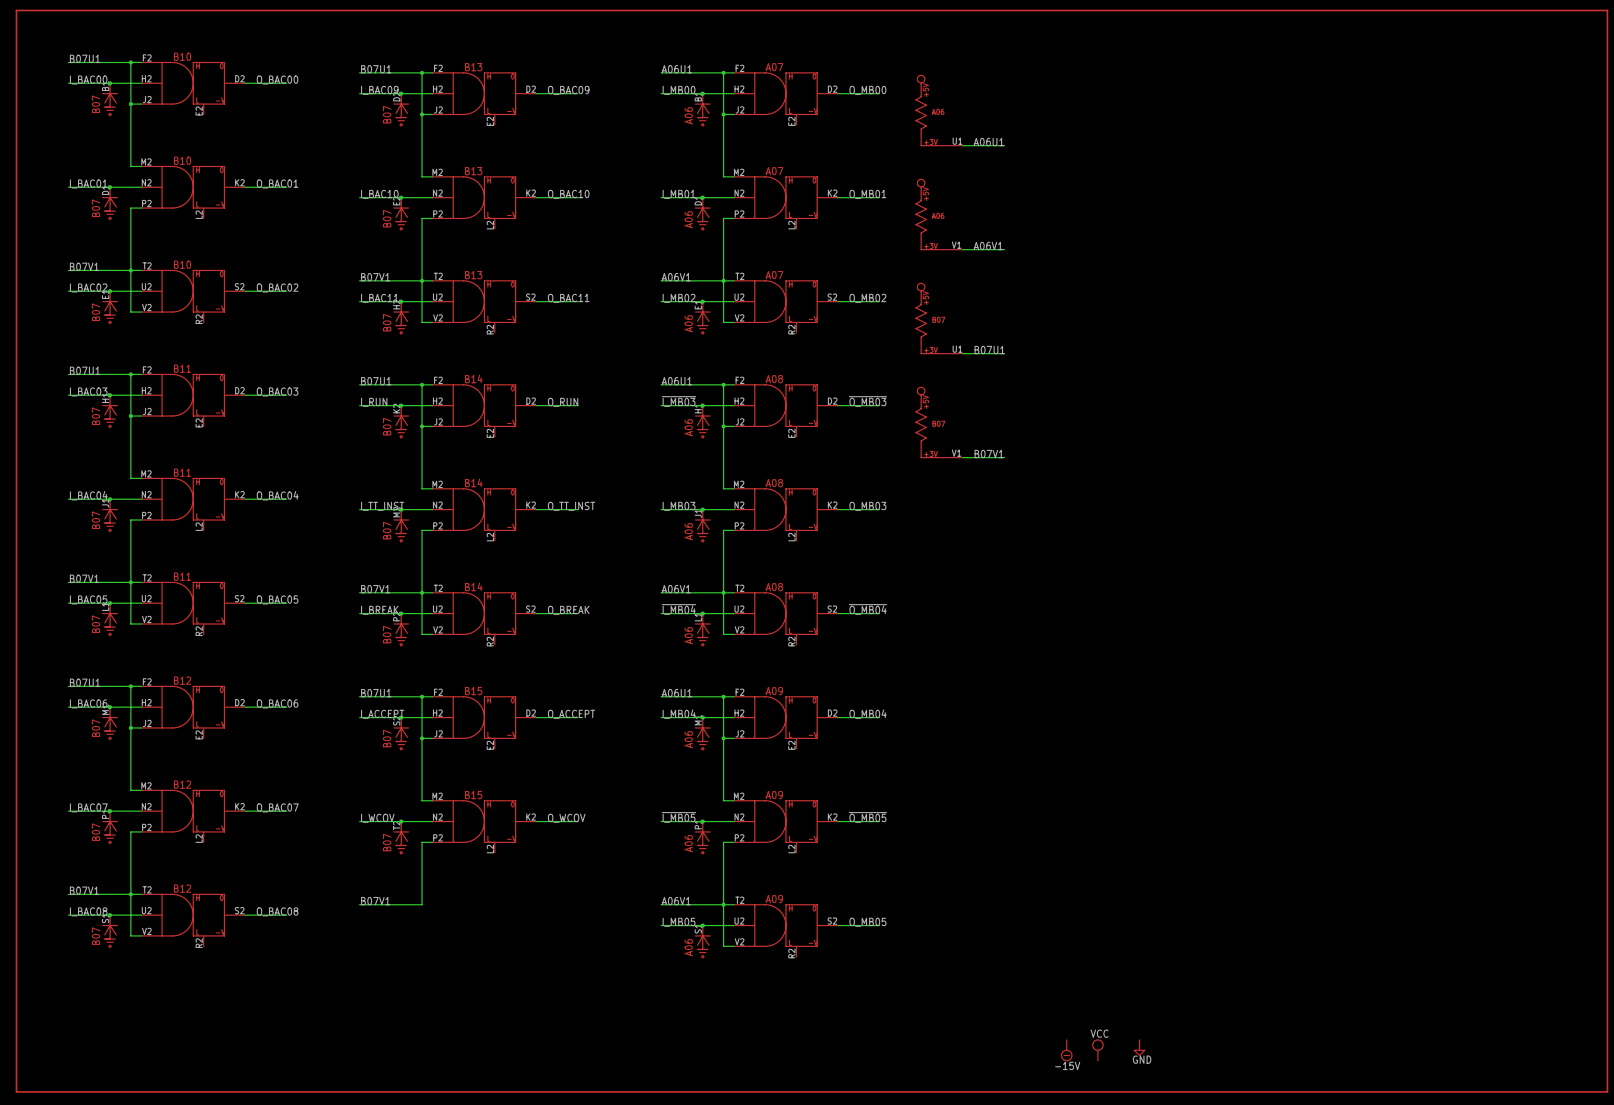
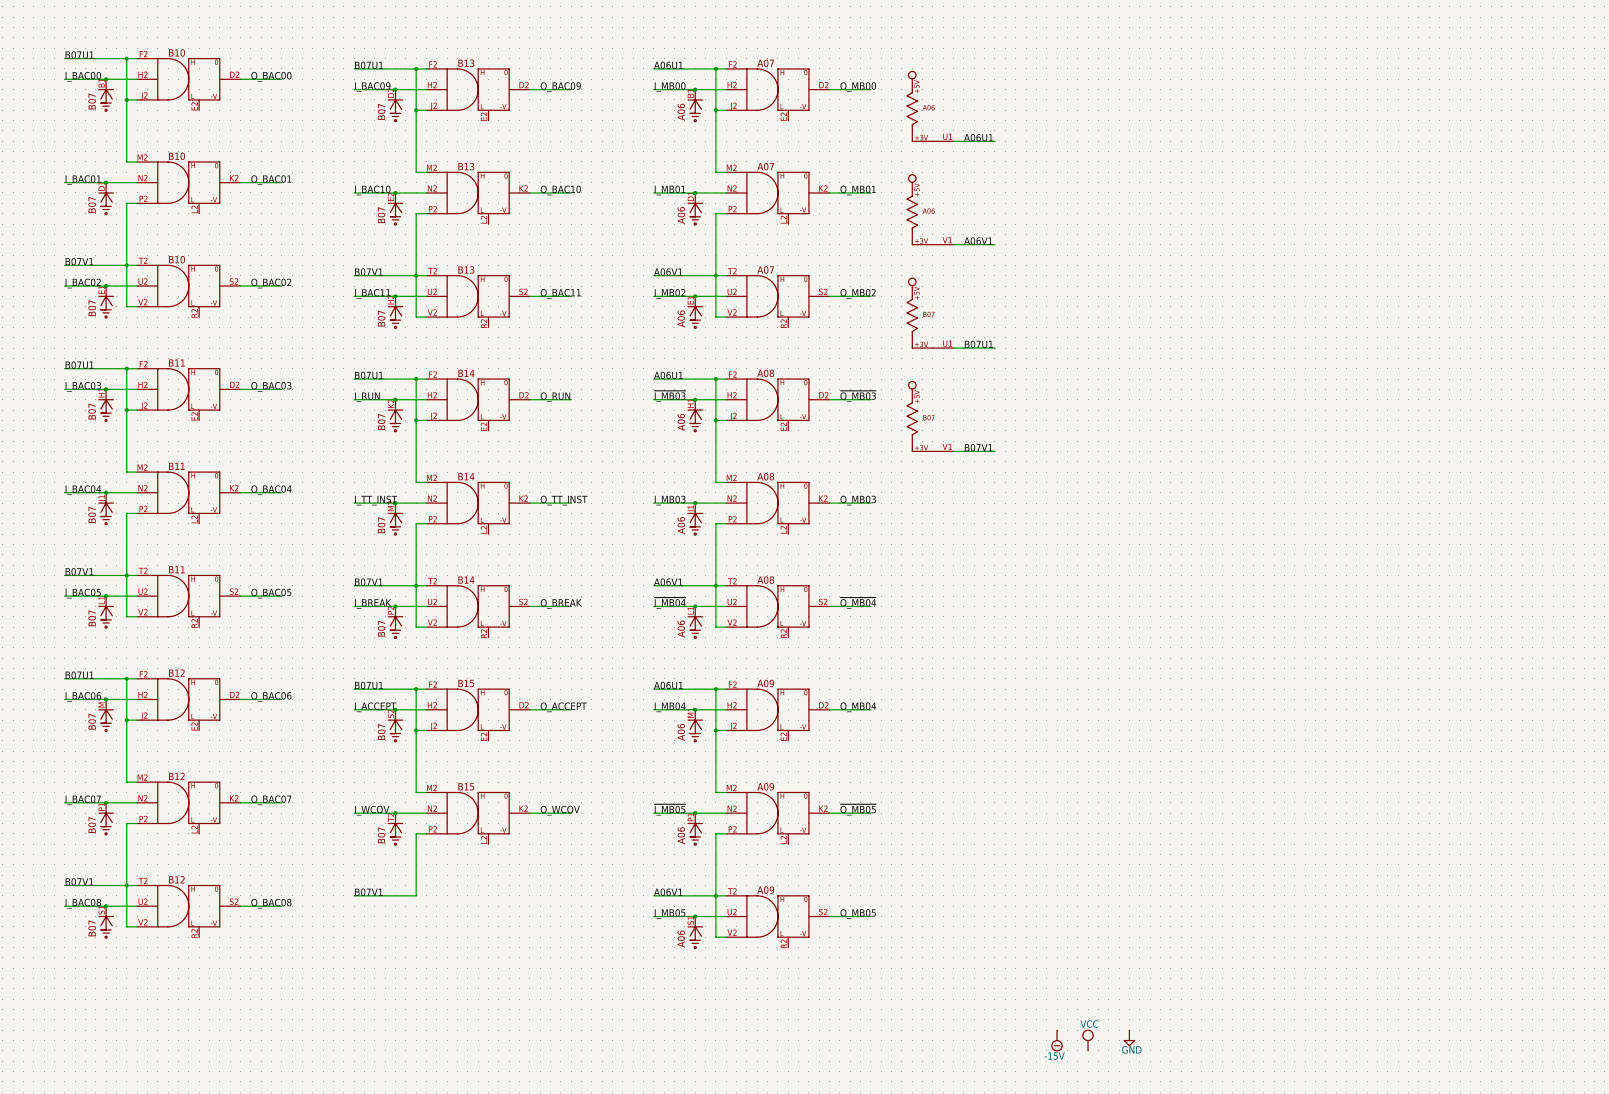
part: (811, 551) -> none

